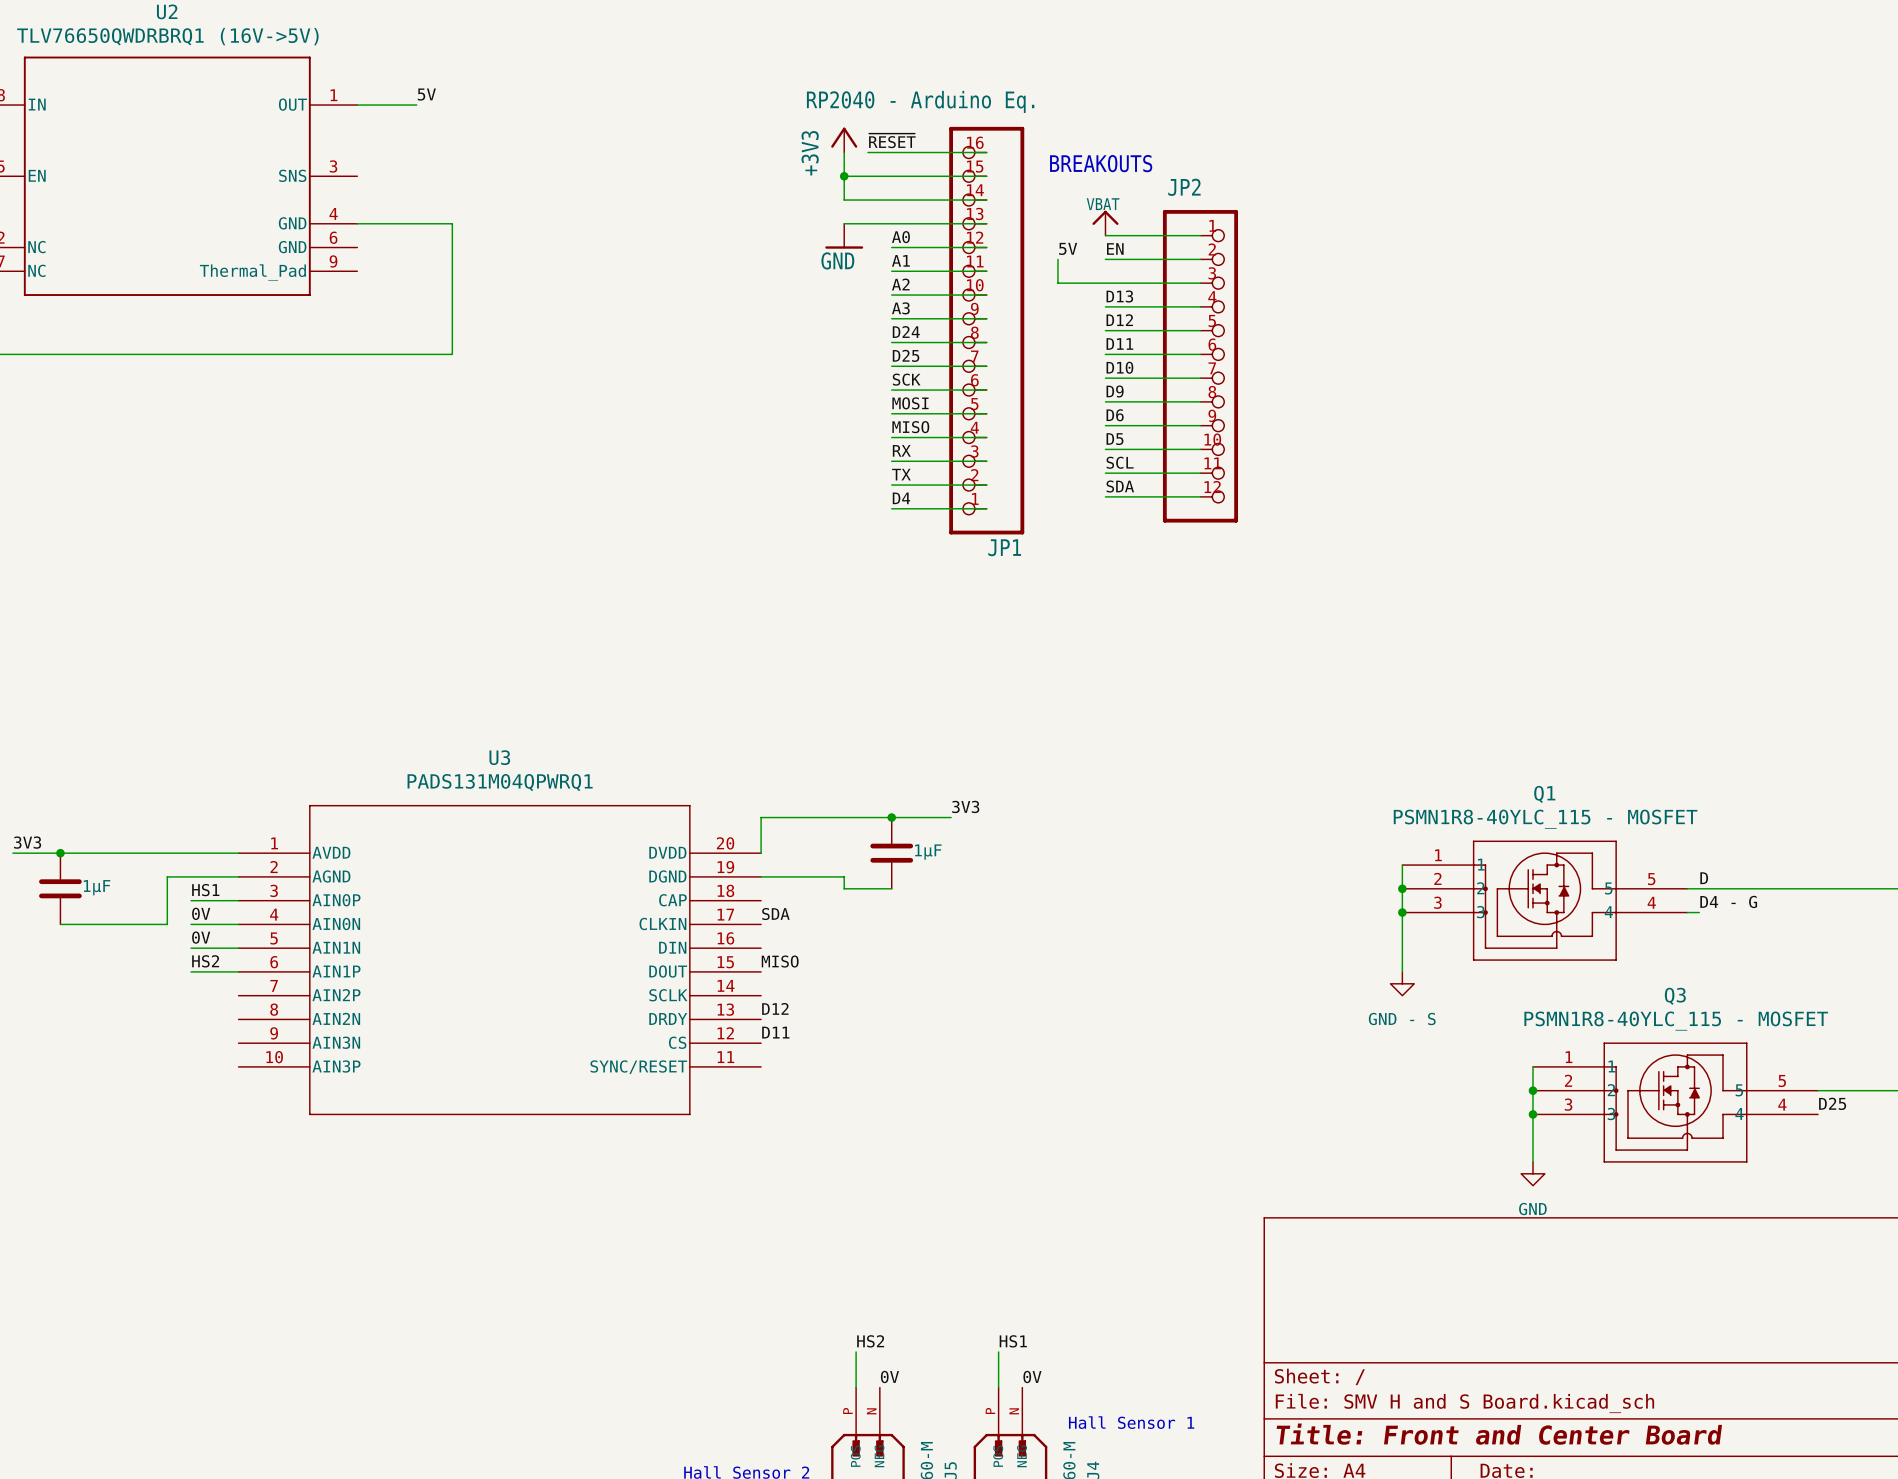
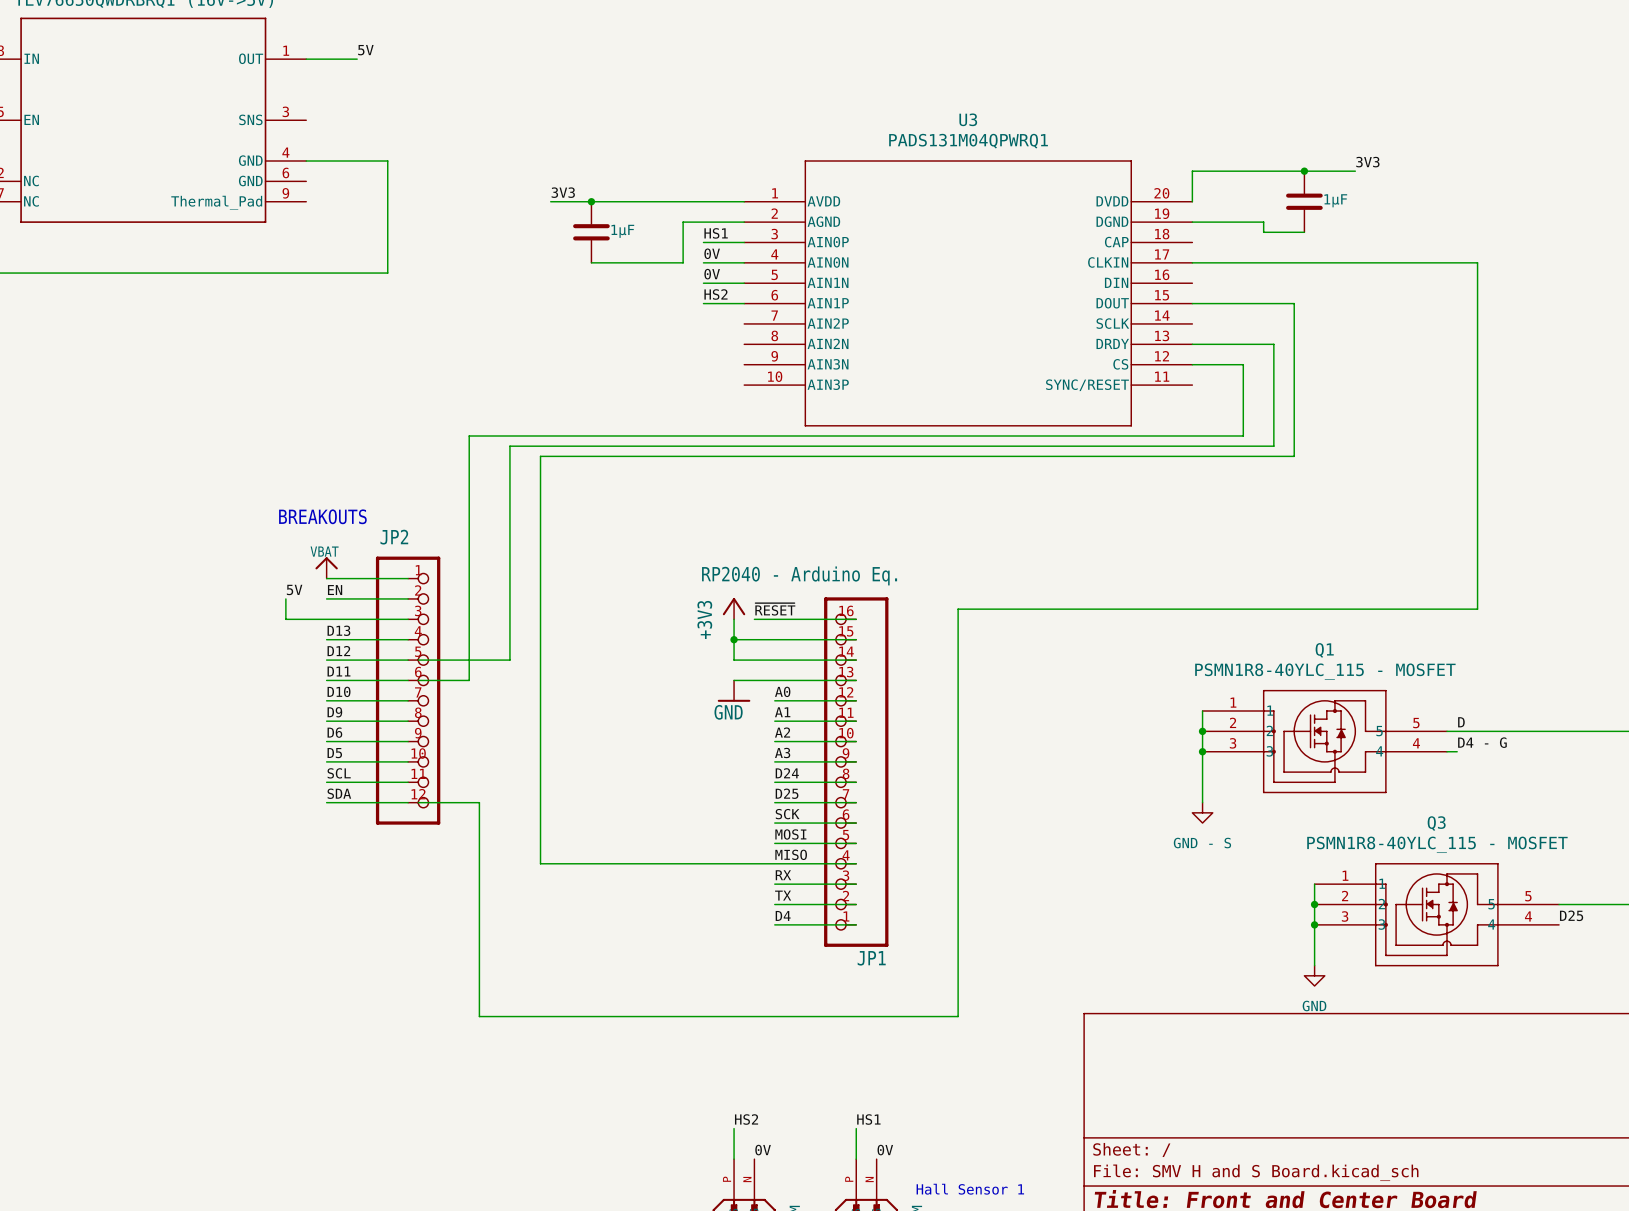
power symbol: +3V3 (844, 140) -> none
label: ~{RESET} (892, 140) -> none
wire: (844, 152) (844, 200) (986, 200) -> none
wire: (867, 152) (986, 152) -> none
text: BREAKOUTS (1101, 163) -> none
wire: (844, 176) (986, 176) -> none
junction: (844, 176) -> none
wire: (844, 223) (986, 223) -> none
power symbol: VBAT (1105, 223) -> none
label: none -> 3V3 (1367, 162)
wire: (1105, 235) (1200, 235) -> none
junction: none -> (1304, 171)
wire: none -> (1355, 171) (1192, 171) (1192, 201)
power symbol: GND (844, 236) -> none
label: A0 (900, 237) -> none
wire: (891, 247) (986, 247) -> none
label: 5V (1068, 248) -> none
label: EN (1115, 248) -> none
wire: (1057, 259) (1057, 283) (1200, 283) -> none
wire: (1105, 259) (1200, 259) -> none
label: none -> 3V3 (563, 192)
label: A1 (900, 260) -> none
wire: none -> (550, 201) (744, 201)
junction: none -> (591, 201)
part: none -> 1µF (1304, 201)
label: A2 (900, 284) -> none
wire: none -> (744, 222) (683, 222) (683, 262) (591, 262)
wire: none -> (1192, 222) (1263, 222) (1263, 232) (1304, 232)
label: D13 (1119, 296) -> none
part: none -> 1µF (591, 232)
wire: (1105, 306) (1200, 306) -> none
label: none -> HS1 (716, 233)
label: A3 (900, 308) -> none
wire: none -> (703, 242) (744, 242)
label: D12 (1119, 320) -> none
JP1 position: (986, 330) -> (856, 772)
wire: (1105, 330) (1200, 330) -> none
label: none -> 0V (712, 253)
label: D24 (906, 332) -> none
wire: none -> (703, 262) (744, 262)
wire: none -> (1192, 262) (1477, 262) (1477, 609) (958, 609) (958, 1016) (479, 1016) (479, 802) (418, 802)
label: D11 (1119, 343) -> none
wire: (1105, 354) (1200, 354) -> none
label: none -> 0V (712, 274)
label: D25 (906, 355) -> none
wire: none -> (703, 283) (744, 283)
JP2 position: (1200, 366) -> (408, 690)
label: D10 (1119, 367) -> none
wire: (1105, 378) (1200, 378) -> none
label: none -> HS2 (715, 294)
label: SCK (906, 379) -> none
wire: none -> (703, 303) (744, 303)
wire: none -> (1192, 303) (1294, 303) (1294, 456) (540, 456) (540, 863) (856, 863)
label: D9 (1115, 391) -> none
wire: (1105, 401) (1200, 401) -> none
label: MOSI (910, 403) -> none
label: D6 (1115, 415) -> none
wire: (1105, 425) (1200, 425) -> none
label: MISO (910, 427) -> none
wire: none -> (1192, 344) (1273, 344) (1273, 446) (509, 446) (509, 660) (418, 660)
label: D5 (1114, 439) -> none
wire: (1105, 449) (1200, 449) -> none
label: RX (901, 450) -> none
wire: none -> (1192, 364) (1243, 364) (1243, 436) (469, 436) (469, 680) (418, 680)
label: SCL (1120, 462) -> none
wire: (1105, 473) (1200, 473) -> none
label: TX (901, 474) -> none
label: SDA (1120, 486) -> none
wire: (1105, 496) (1200, 496) -> none
label: D4 (901, 498) -> none
wire: (891, 508) (986, 508) -> none
text: none -> BREAKOUTS (322, 516)
power symbol: none -> VBAT (326, 567)
wire: none -> (326, 578) (408, 578)
label: none -> 5V (294, 589)
label: none -> EN (335, 590)
wire: none -> (285, 598) (285, 619) (408, 619)
wire: none -> (326, 598) (408, 598)
power symbol: none -> +3V3 (734, 608)
label: none -> ~{RESET} (775, 609)
wire: none -> (734, 619) (734, 660) (856, 660)
wire: none -> (754, 619) (856, 619)
label: none -> D13 (338, 630)
wire: none -> (326, 639) (408, 639)
wire: none -> (734, 639) (856, 639)
label: none -> D12 (338, 651)
label: 3V3 (965, 806) -> none
junction position: (891, 817) -> (734, 639)
wire: (951, 817) (761, 817) (761, 853) -> none
label: none -> D11 (338, 671)
wire: none -> (326, 680) (408, 680)
wire: none -> (734, 680) (856, 680)
power symbol: none -> GND (734, 691)
label: 3V3 (27, 842) -> none
label: none -> D10 (339, 691)
label: none -> A0 (782, 691)
wire: (12, 853) (238, 853) -> none
junction: (60, 853) -> none
wire: none -> (326, 700) (408, 700)
part: 1µF (891, 853) -> none
wire: none -> (774, 700) (856, 700)
label: none -> D9 (334, 712)
label: none -> A1 (782, 712)
wire: (238, 876) (167, 876) (167, 924) (60, 924) -> none
wire: none -> (326, 721) (408, 721)
wire: (761, 876) (844, 876) (844, 888) (891, 888) -> none
wire: none -> (774, 721) (856, 721)
part: 1µF (60, 888) -> none
label: HS1 (205, 890) -> none
label: none -> D6 (334, 732)
label: none -> A2 (782, 732)
wire: (191, 900) (238, 900) -> none
wire: none -> (326, 741) (408, 741)
wire: none -> (774, 741) (856, 741)
label: 0V (201, 913) -> none
label: none -> D5 (334, 753)
label: SDA (775, 914) -> none
label: none -> A3 (782, 753)
wire: (191, 924) (238, 924) -> none
wire: none -> (326, 761) (408, 761)
wire: none -> (774, 761) (856, 761)
label: 0V (201, 937) -> none
label: none -> SCL (339, 773)
label: none -> D24 (787, 773)
wire: (191, 948) (238, 948) -> none
wire: none -> (326, 782) (408, 782)
wire: none -> (774, 782) (856, 782)
U3 position: (499, 960) -> (968, 293)
label: HS2 (205, 961) -> none
label: none -> SDA (339, 793)
label position: MISO (780, 961) -> MISO (791, 854)
label: none -> D25 (787, 793)
wire: (191, 971) (238, 971) -> none
wire: none -> (326, 802) (408, 802)
wire: none -> (774, 802) (856, 802)
label: none -> SCK (787, 814)
wire: none -> (774, 823) (856, 823)
label: D12 (775, 1008) -> none
label: none -> MOSI (790, 834)
wire: none -> (774, 843) (856, 843)
label: D11 (775, 1032) -> none
label: none -> RX (783, 875)
wire: none -> (774, 884) (856, 884)
label: none -> TX (783, 895)
wire: none -> (774, 904) (856, 904)
label: none -> D4 (783, 915)
wire: none -> (774, 924) (856, 924)

